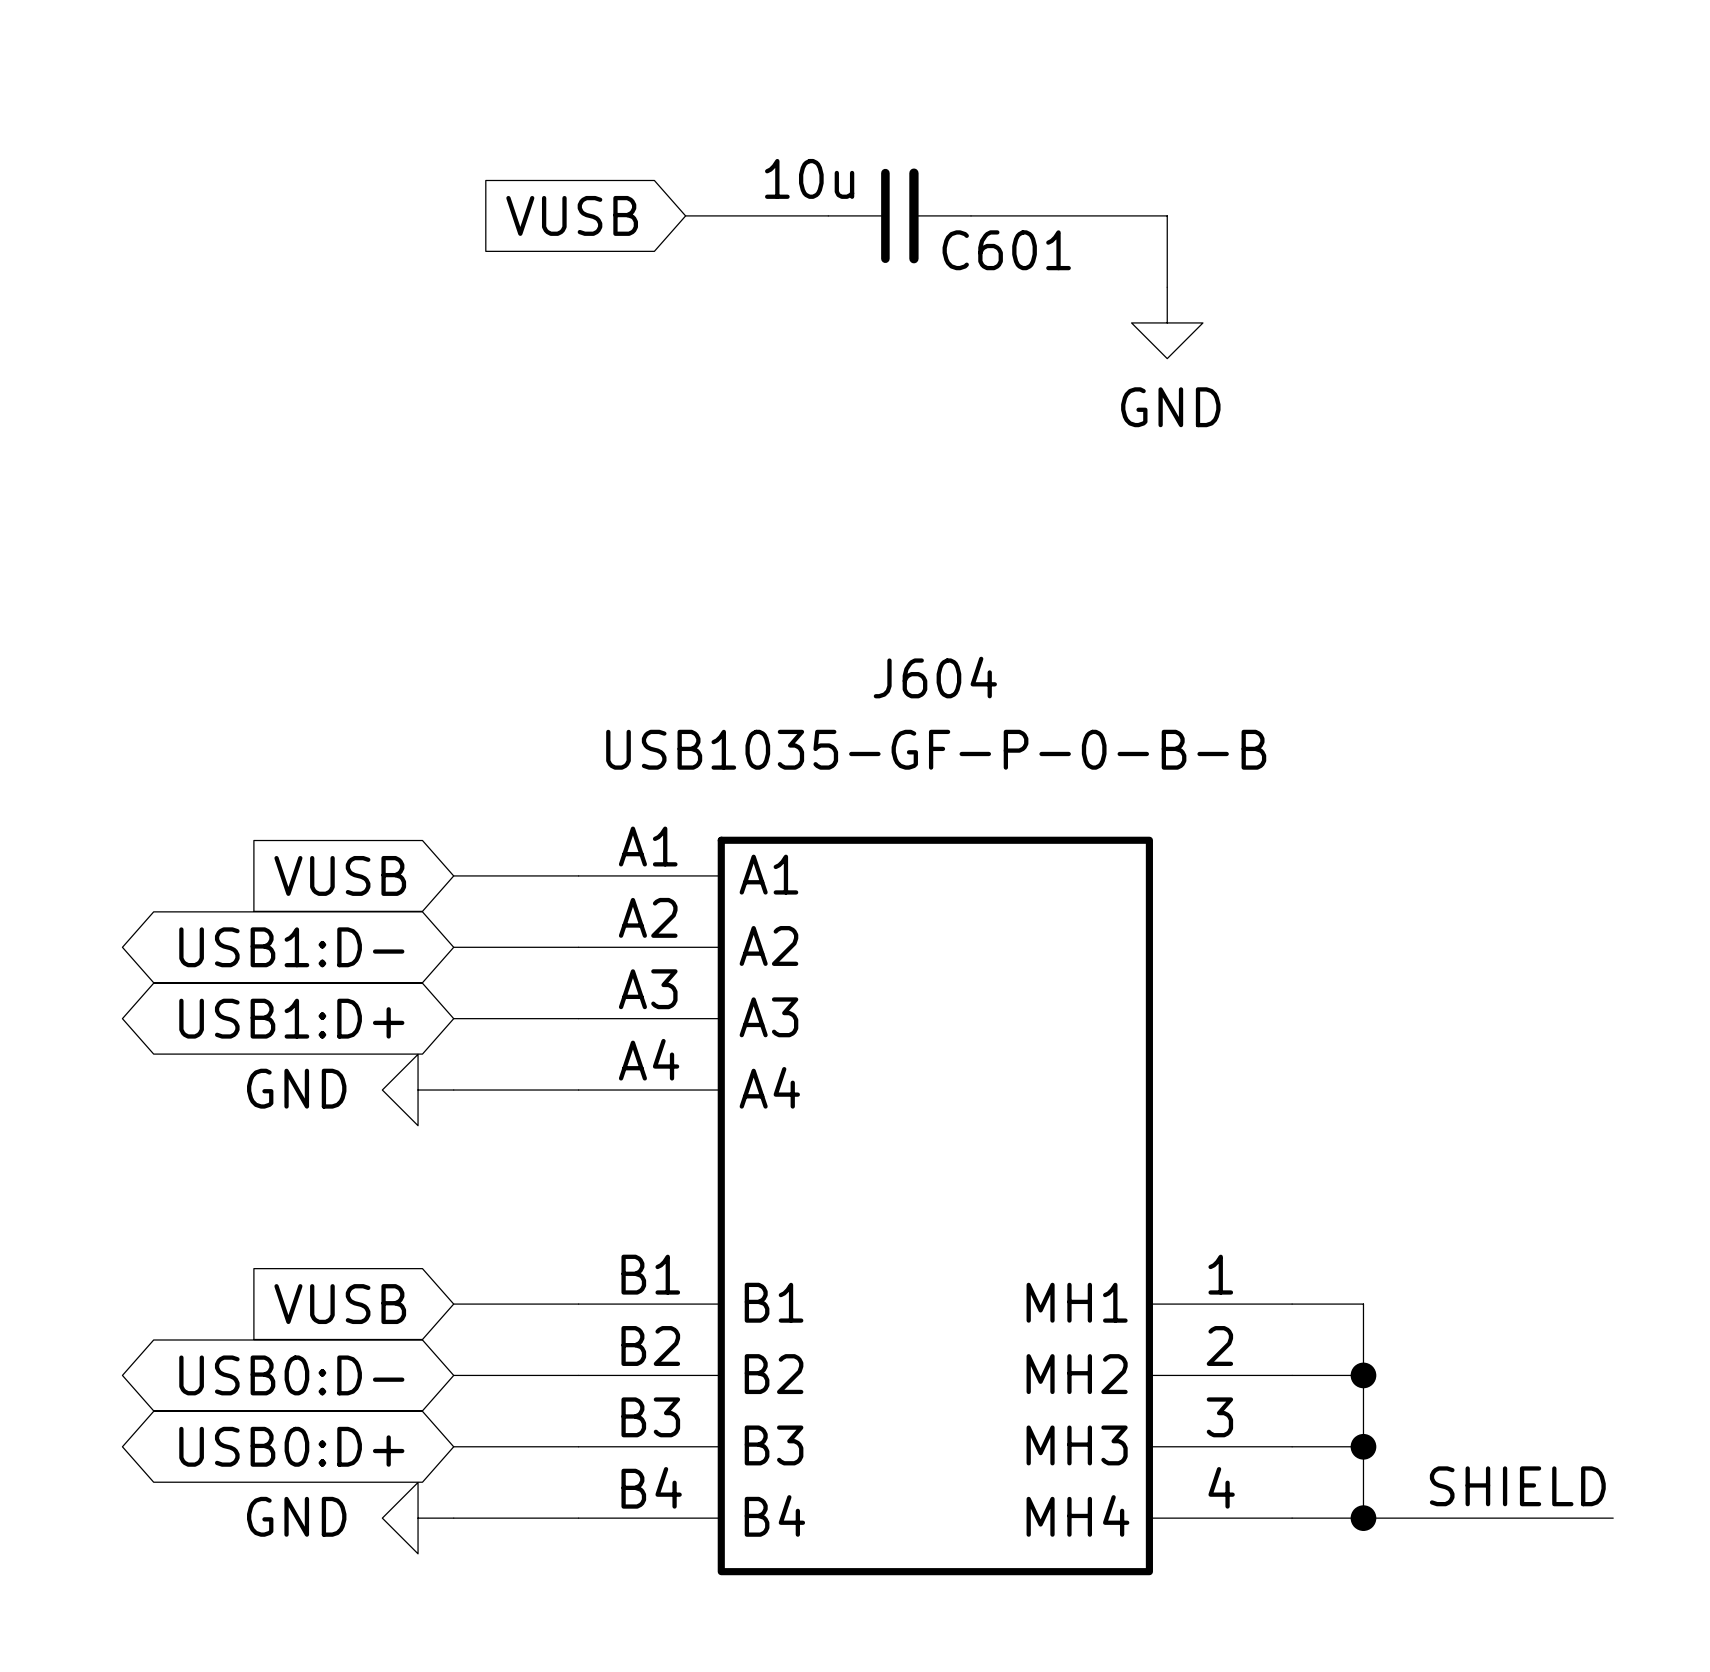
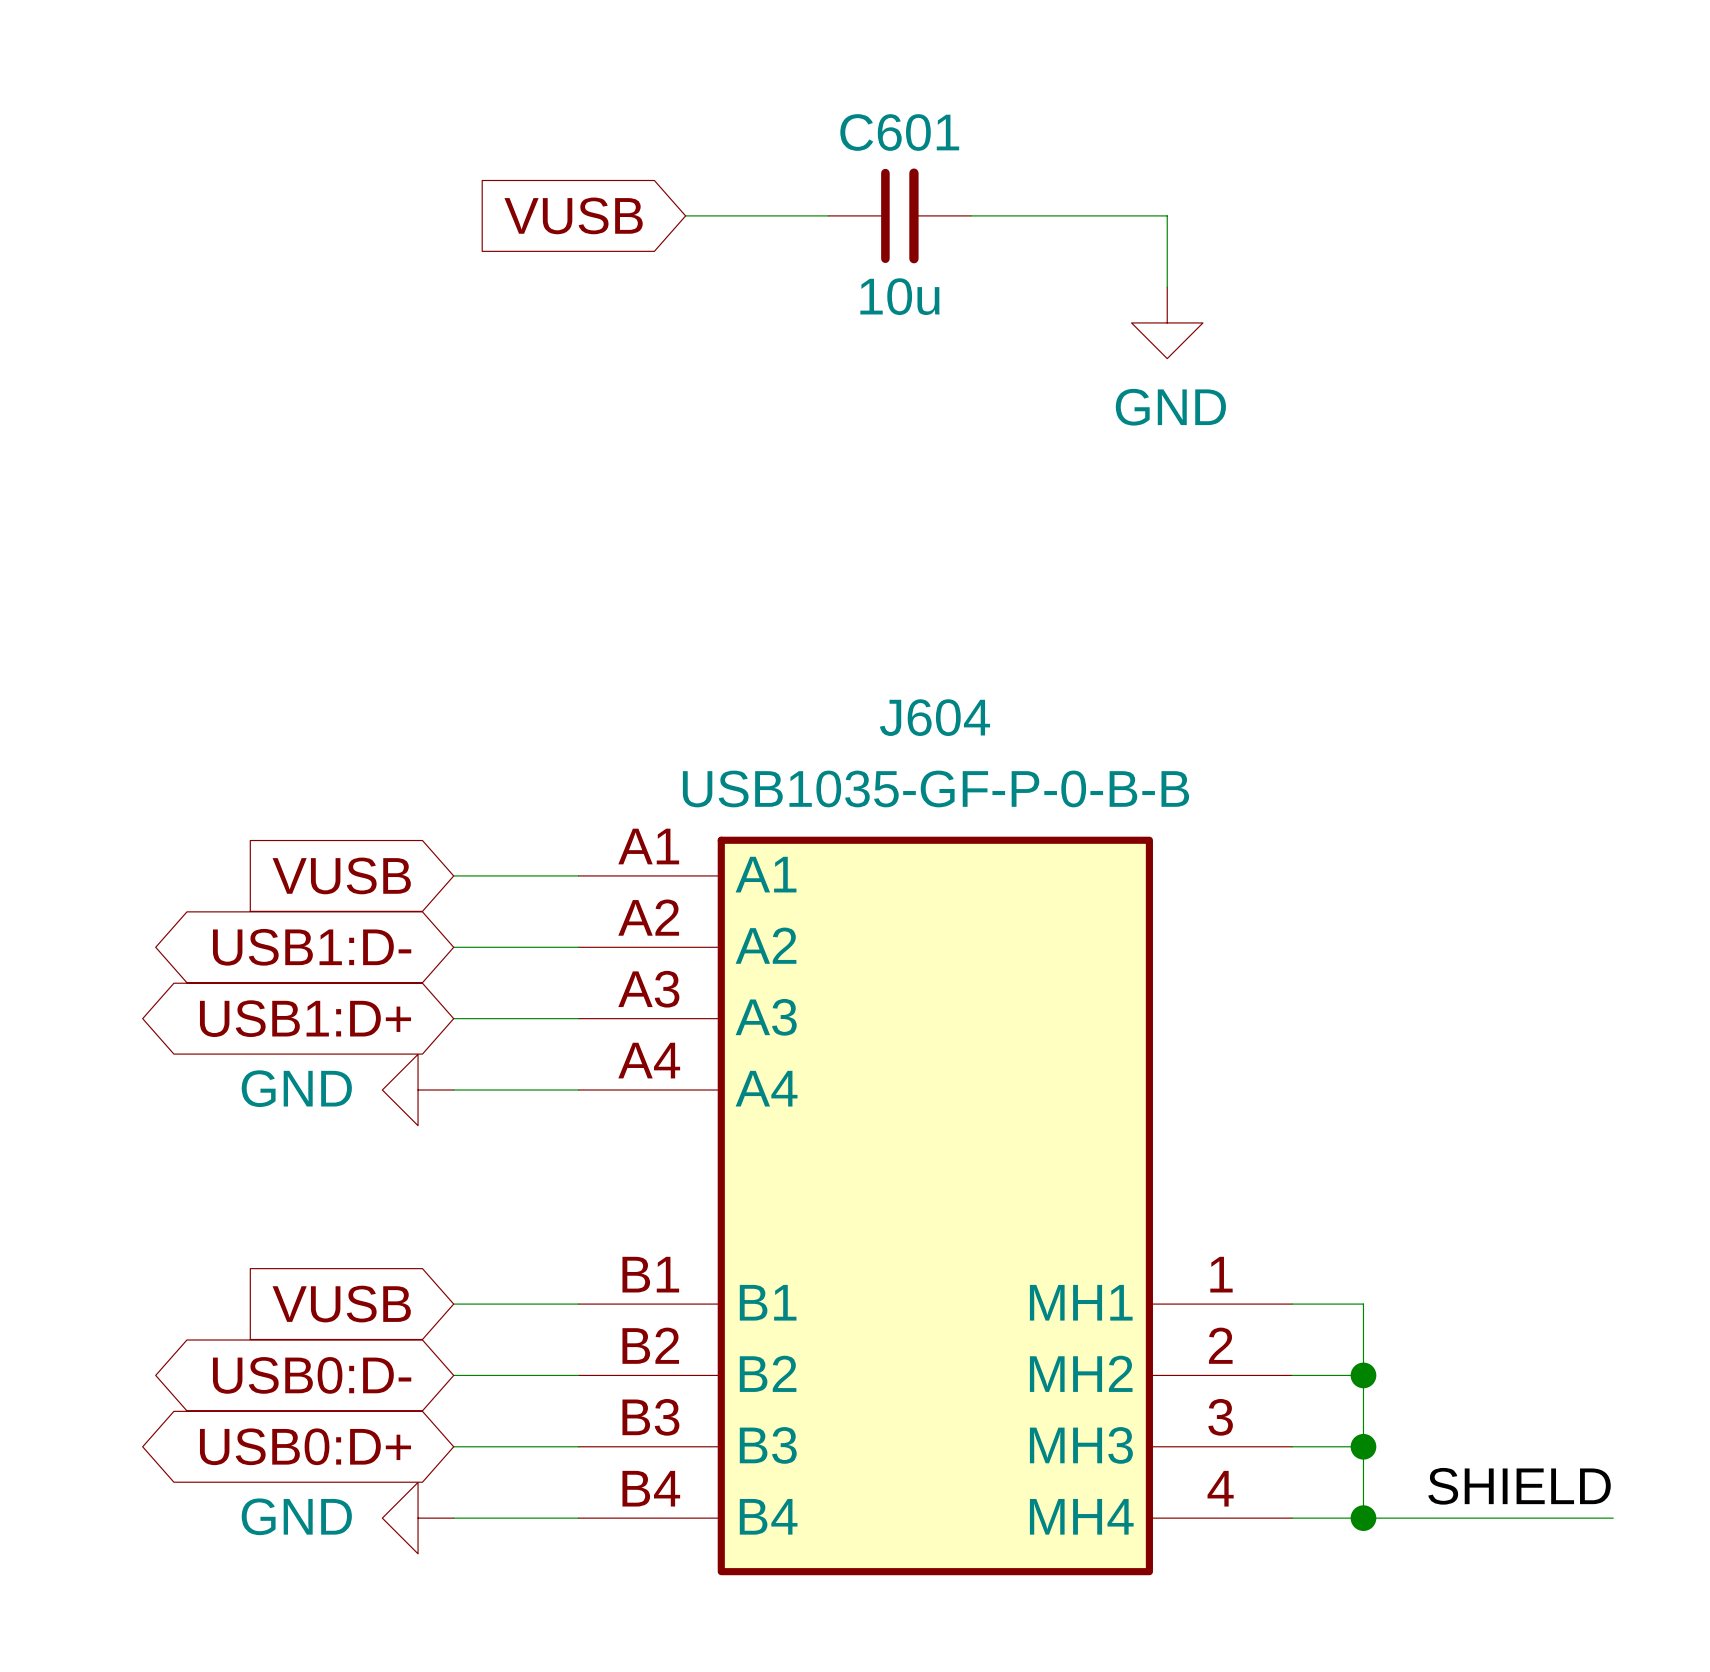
C601 value position: 10u (809, 178) -> 10u (899, 296)
C601 name position: C601 (1006, 250) -> C601 (899, 132)
J604 name position: J604 (935, 677) -> J604 (934, 717)
J604 value position: USB1035-GF-P-0-B-B (936, 749) -> USB1035-GF-P-0-B-B (935, 788)

